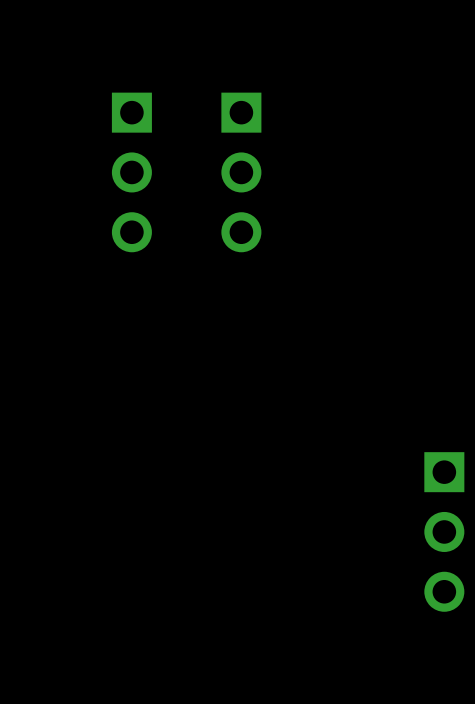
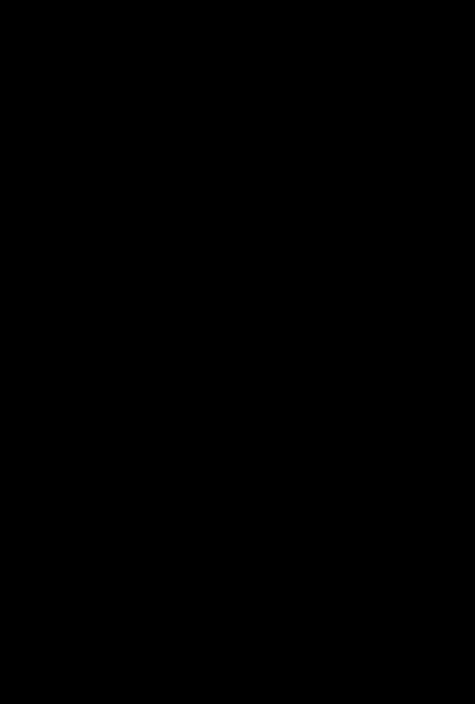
part: (131, 172) -> none
part: (241, 172) -> none
part: (444, 531) -> none

